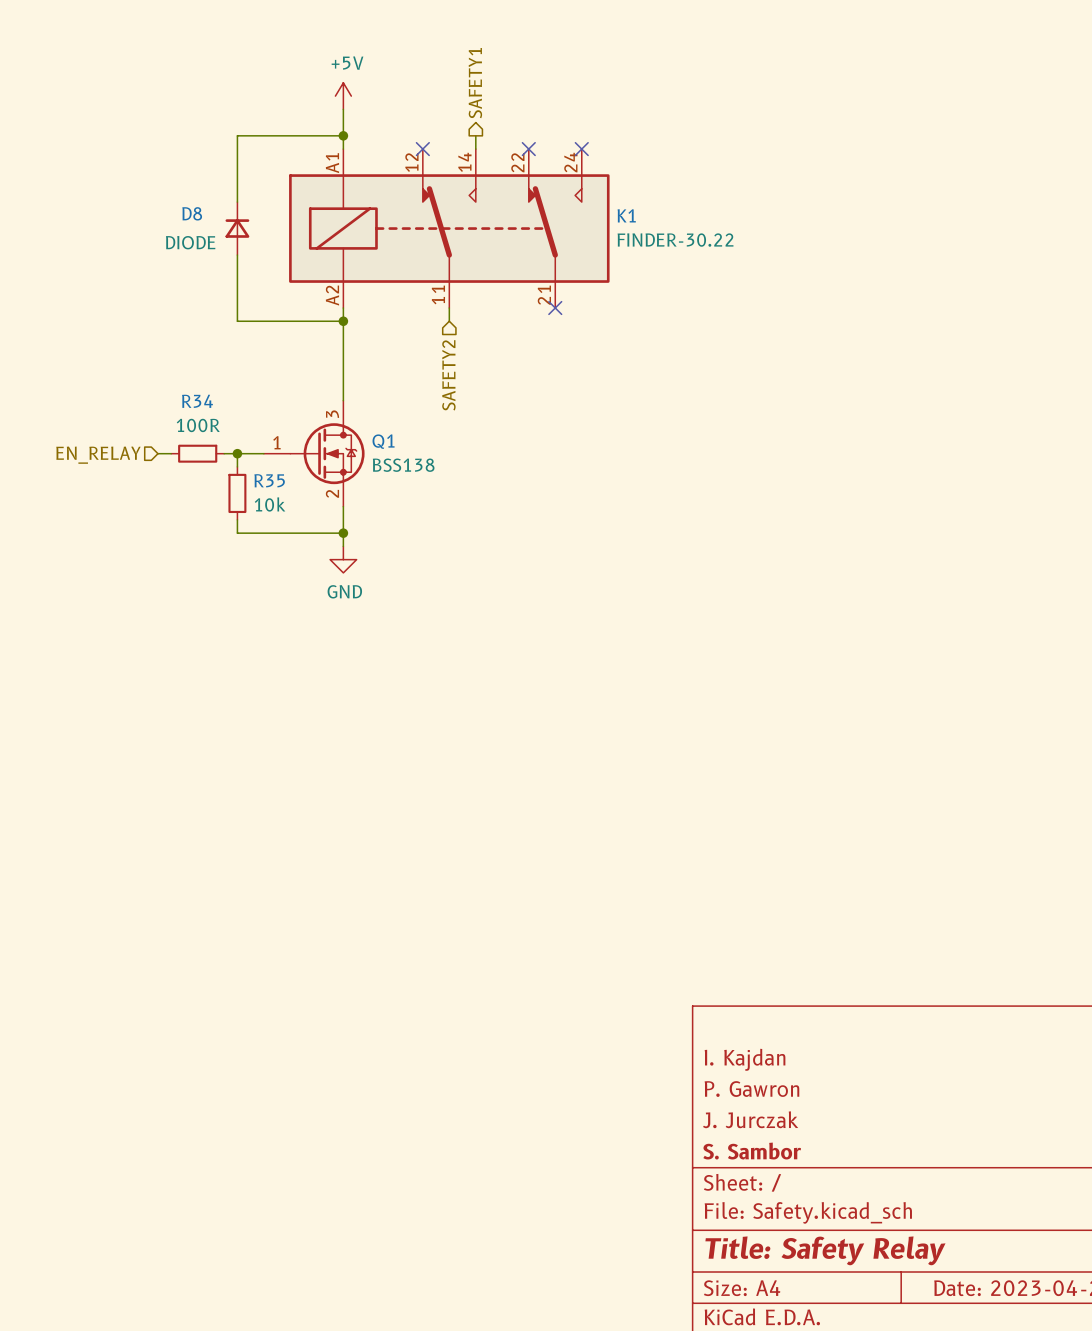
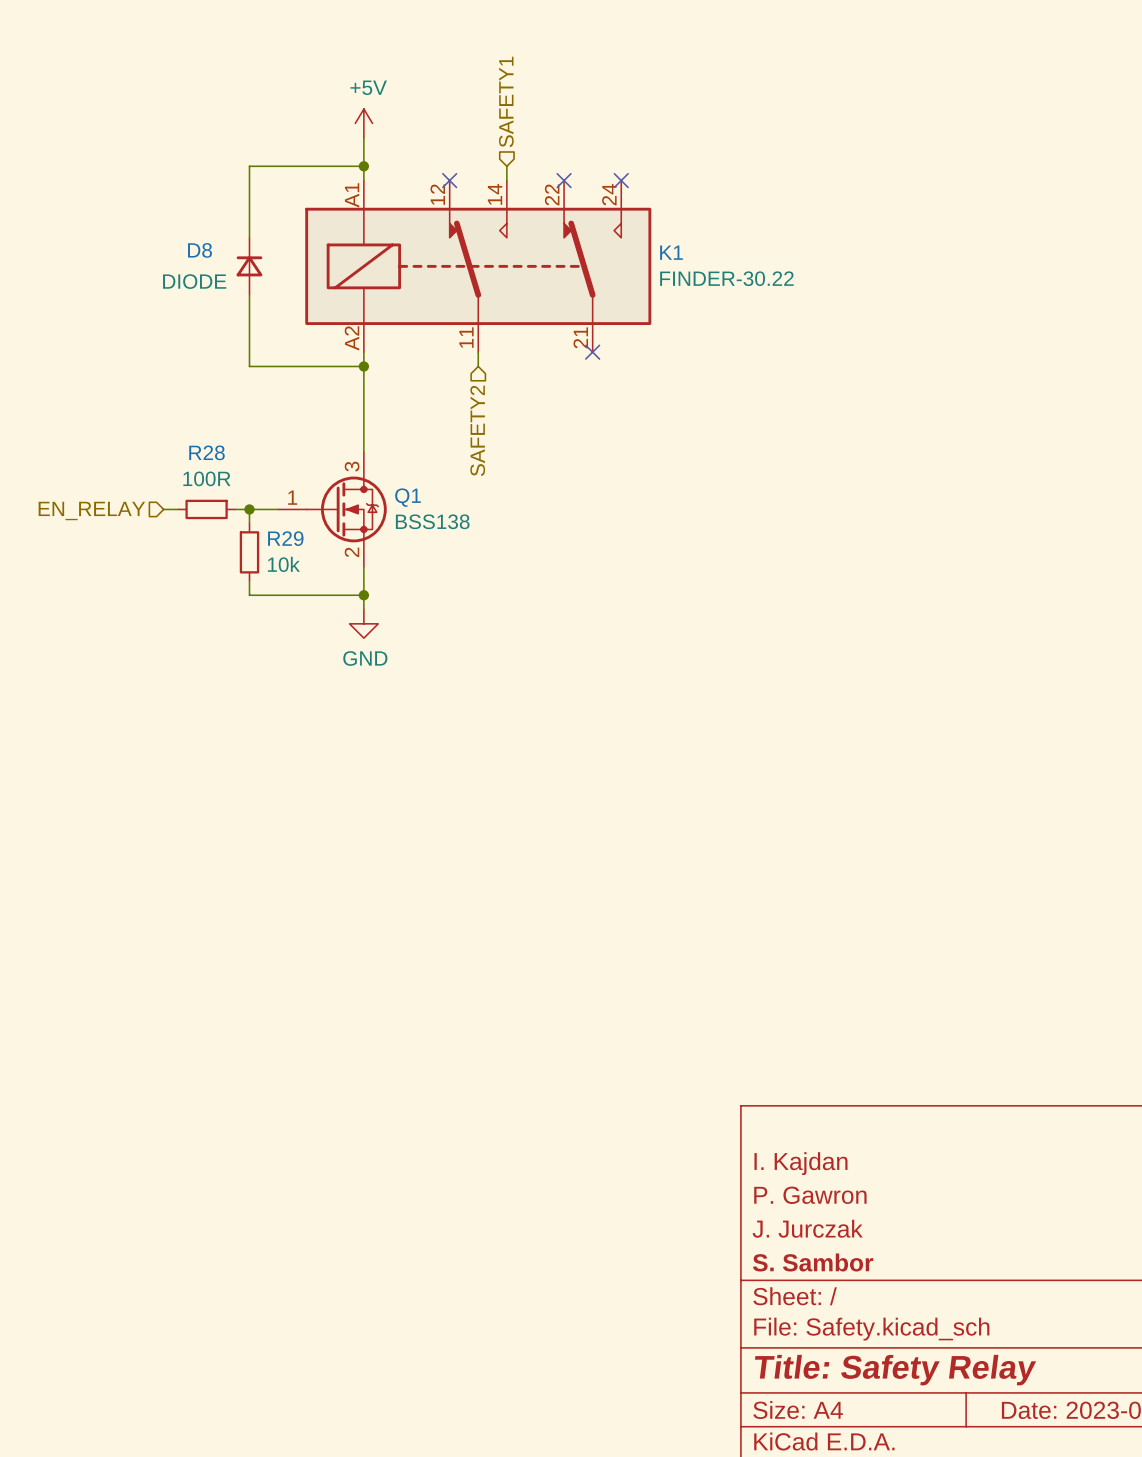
hierarchical label shape: output (475, 83) -> input (506, 101)
R34 name: R34 (197, 401) -> R28 (206, 452)
R35 name: R35 (269, 480) -> R29 (285, 538)

